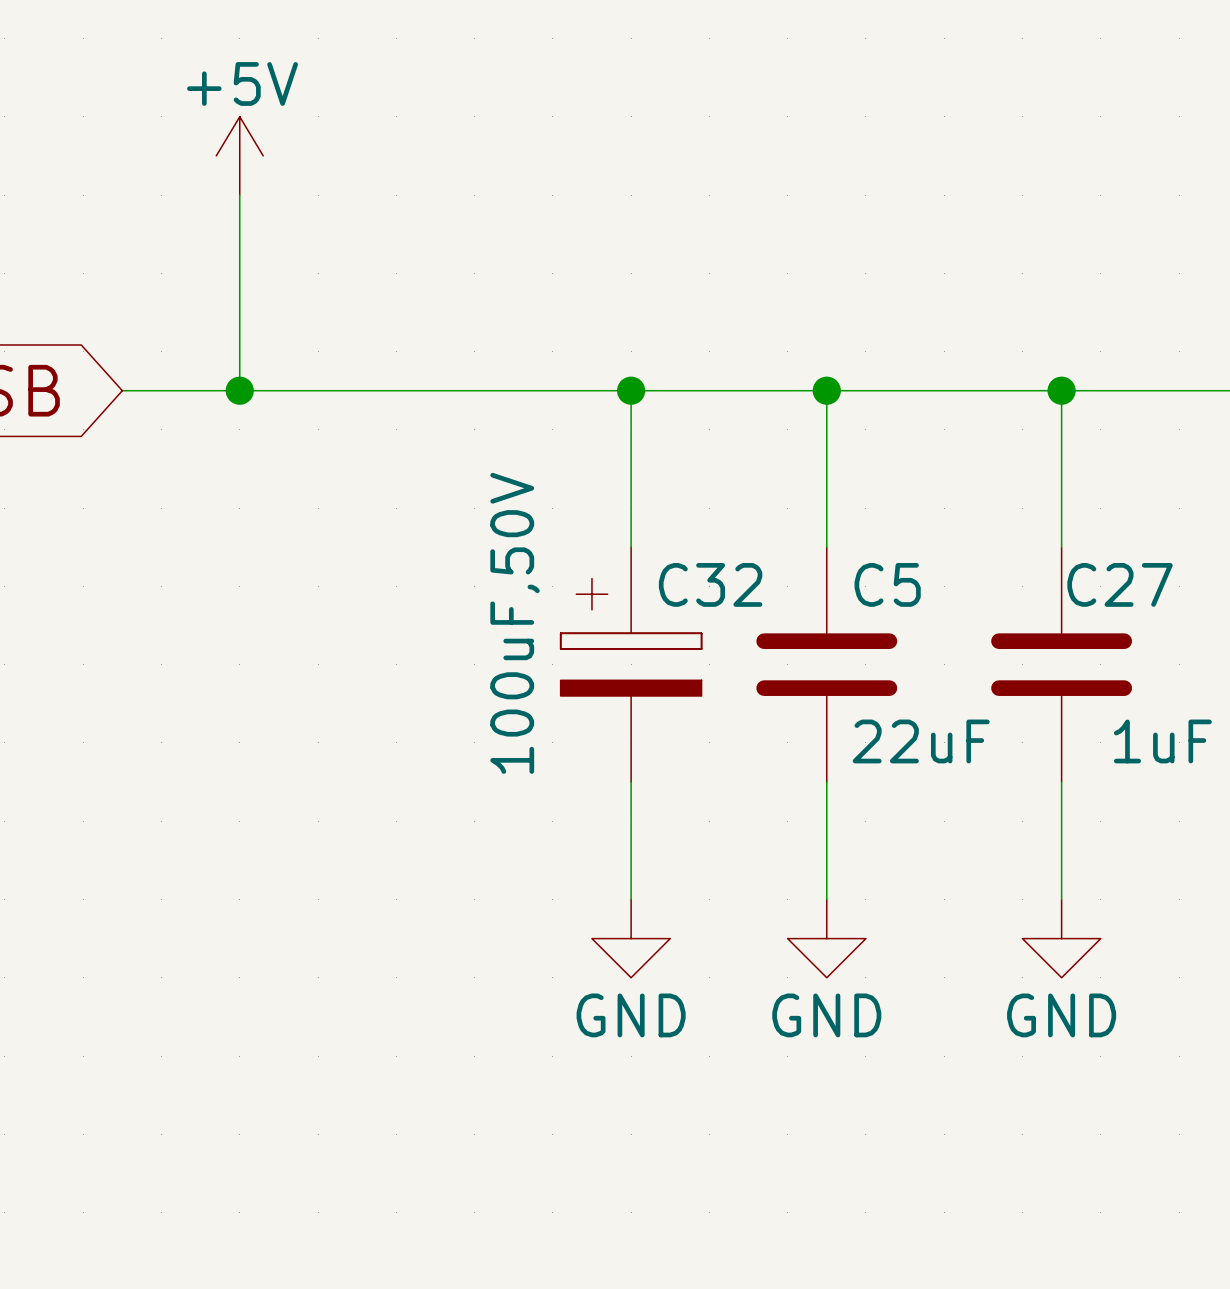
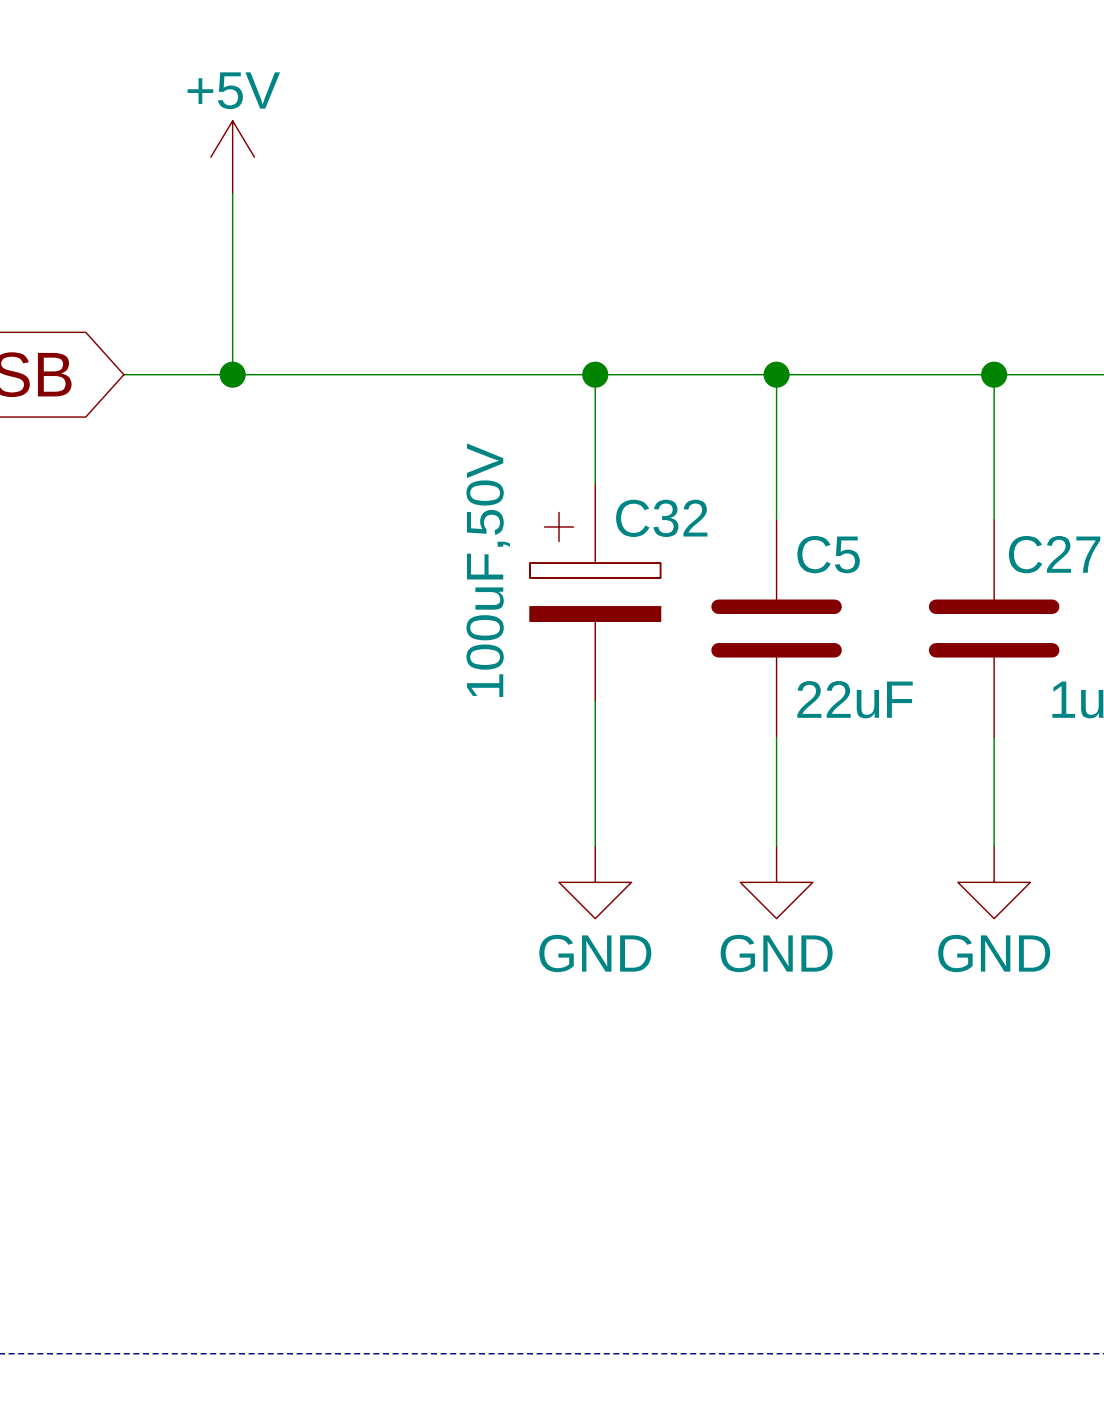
C32 position: (631, 664) -> (595, 592)

